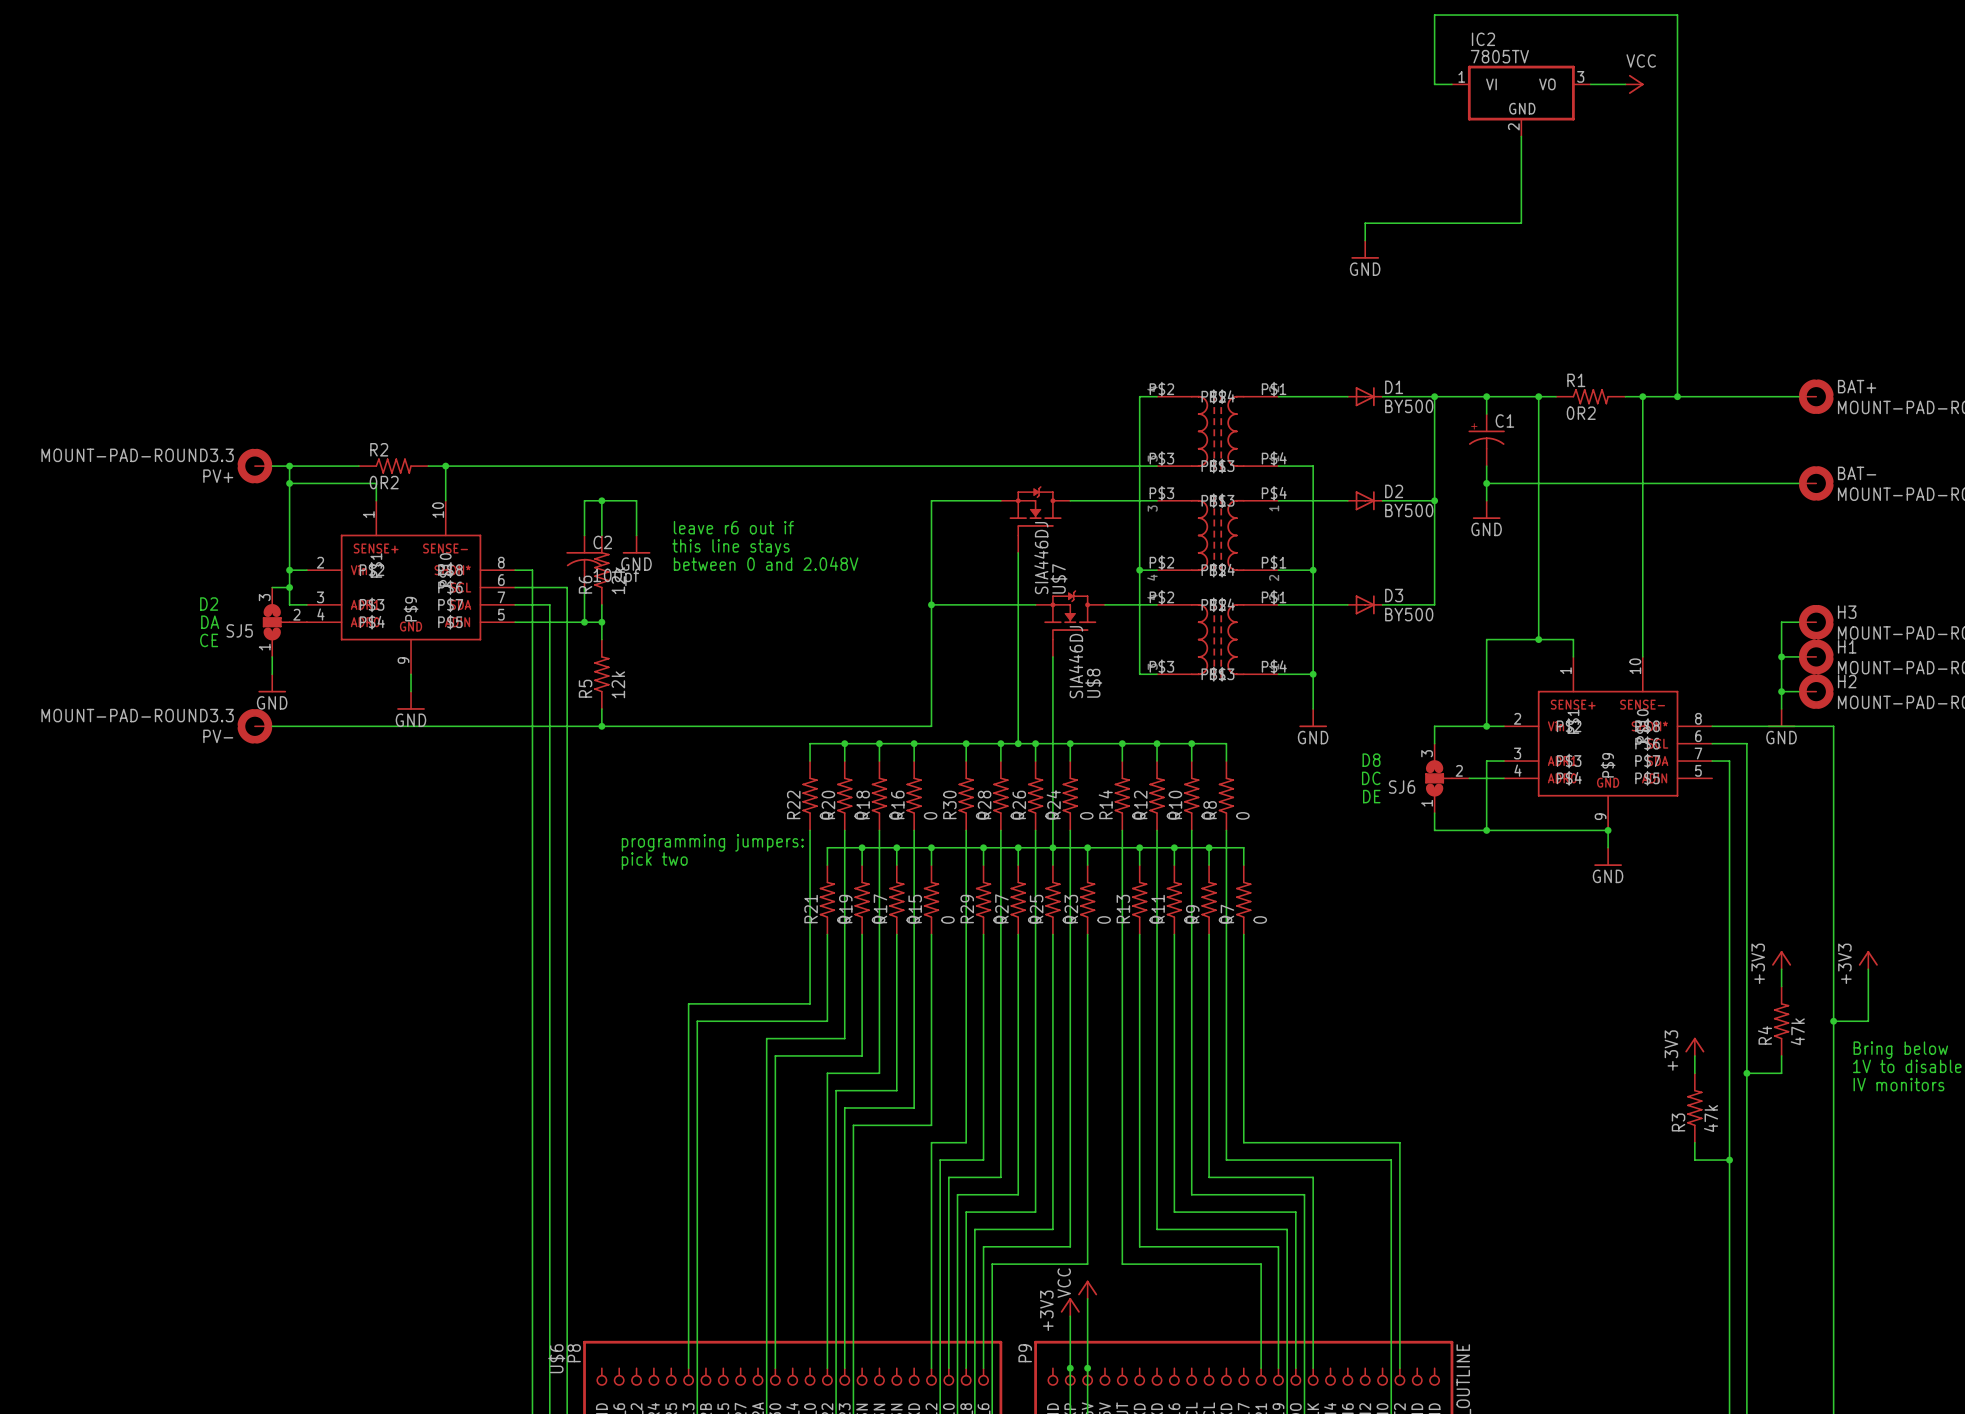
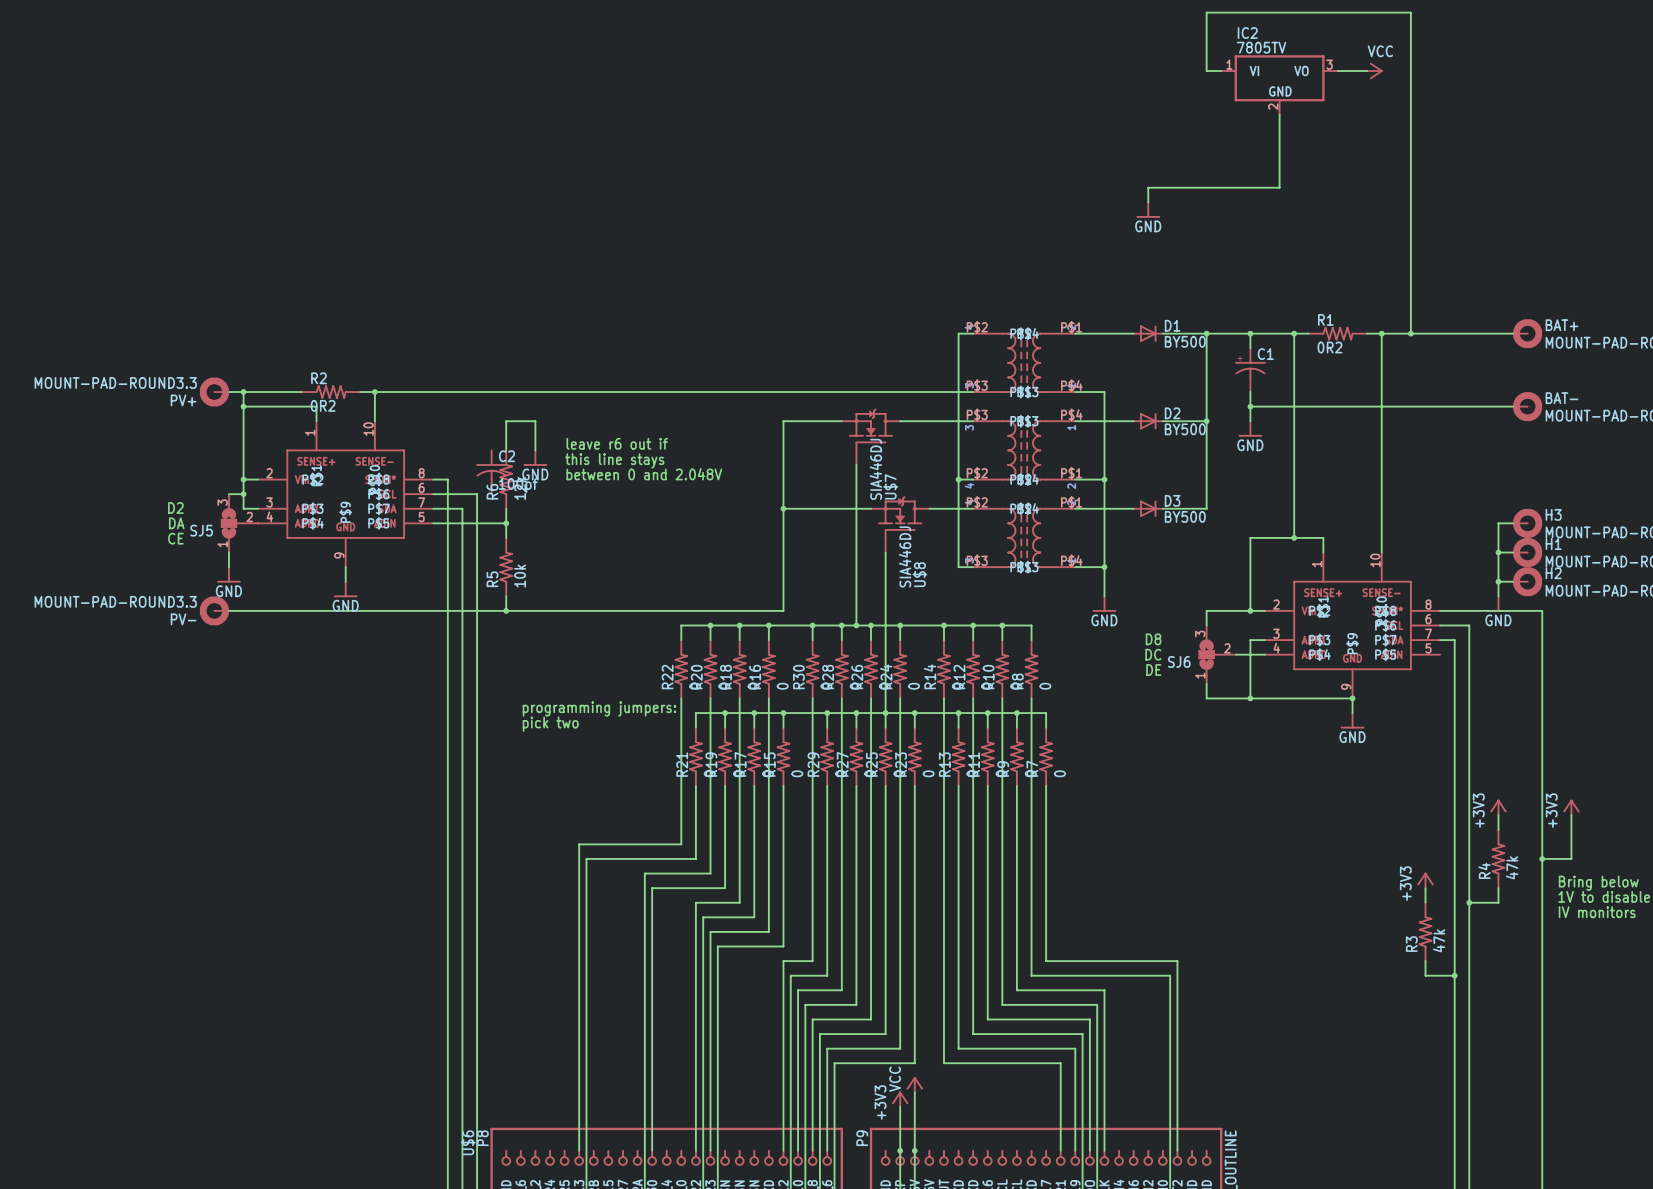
wire: (601, 500) (584, 500) (584, 535) -> none
junction: (601, 500) -> none
wire: (584, 587) (584, 622) -> none
junction: (584, 622) -> none
R5 value: 12k (618, 684) -> 10k (520, 576)

